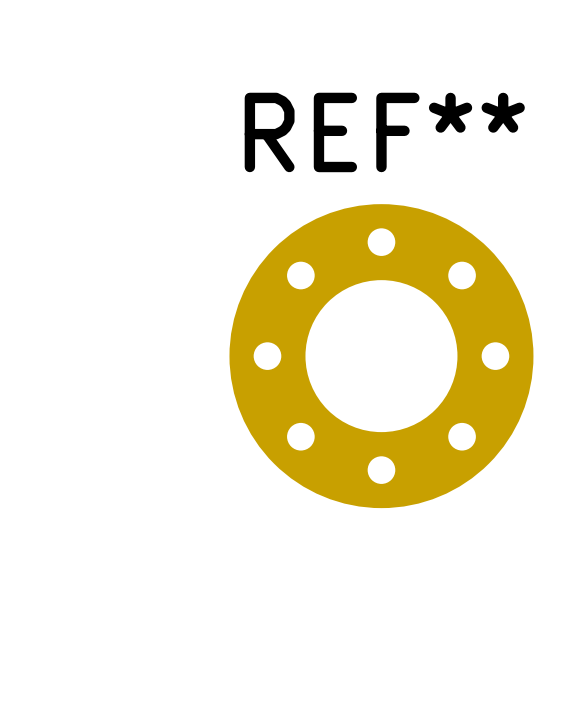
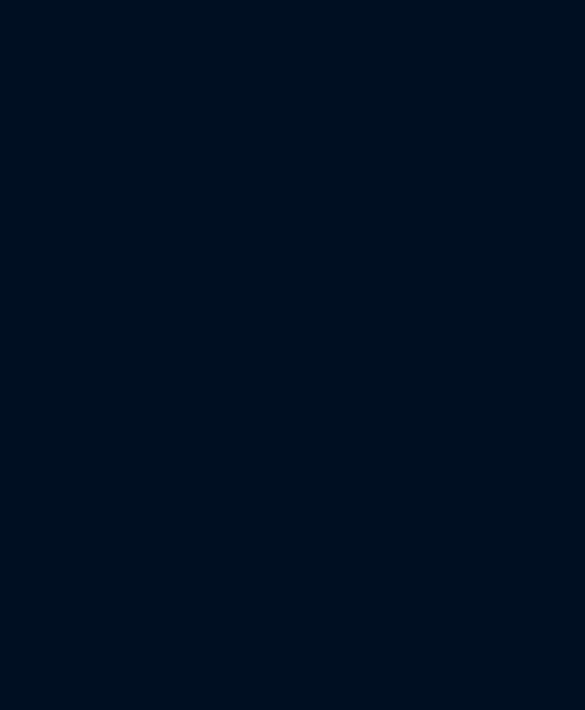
REF**: (381, 356) -> none

